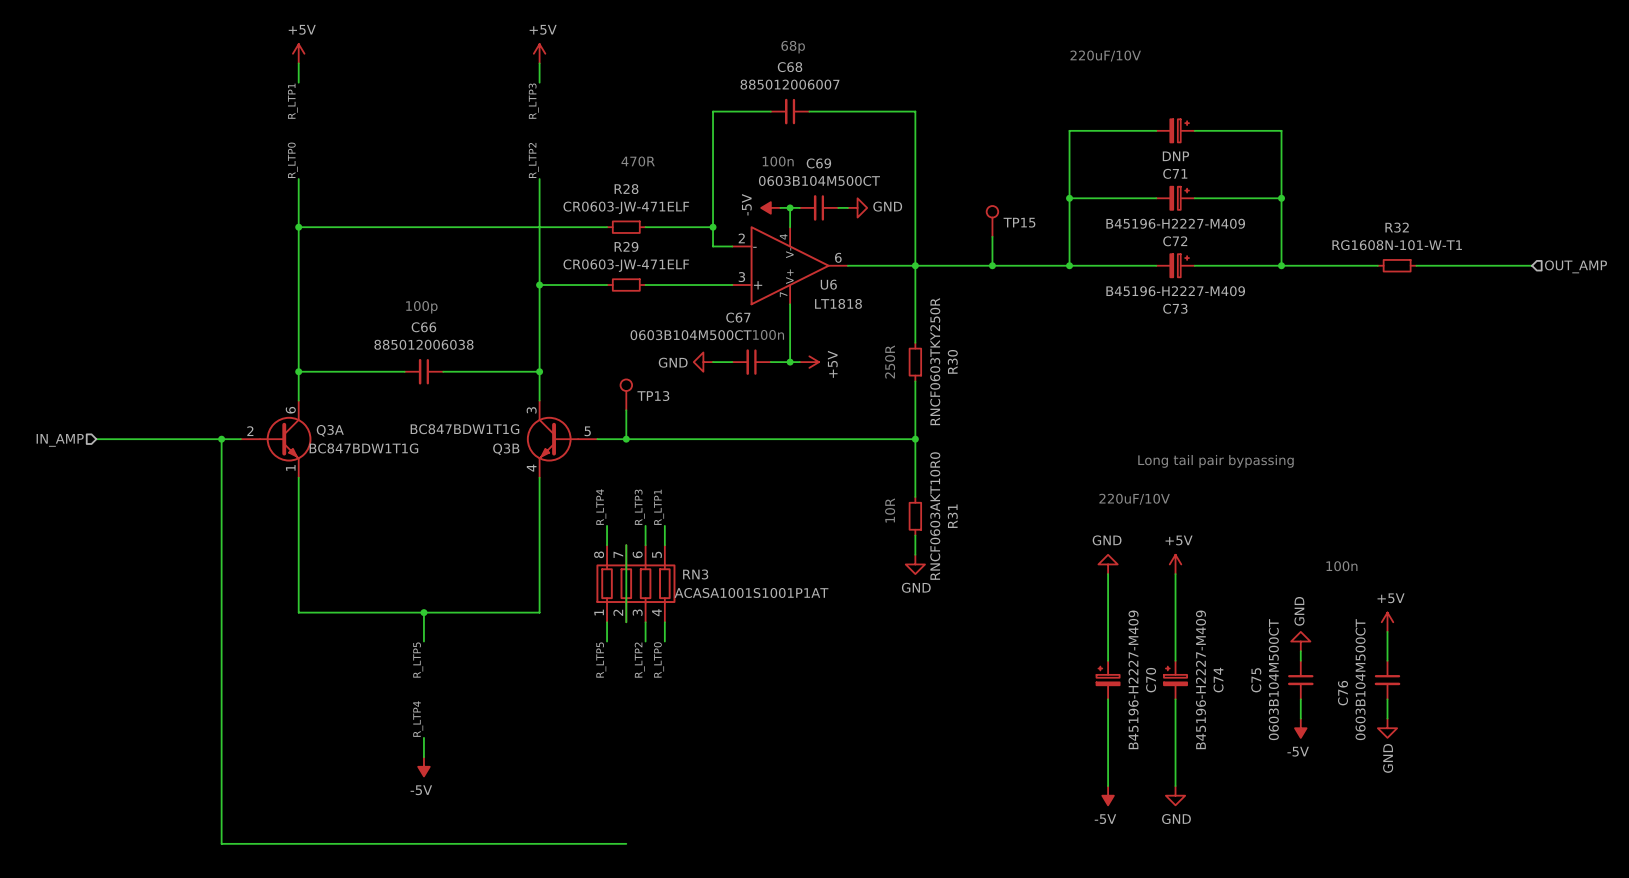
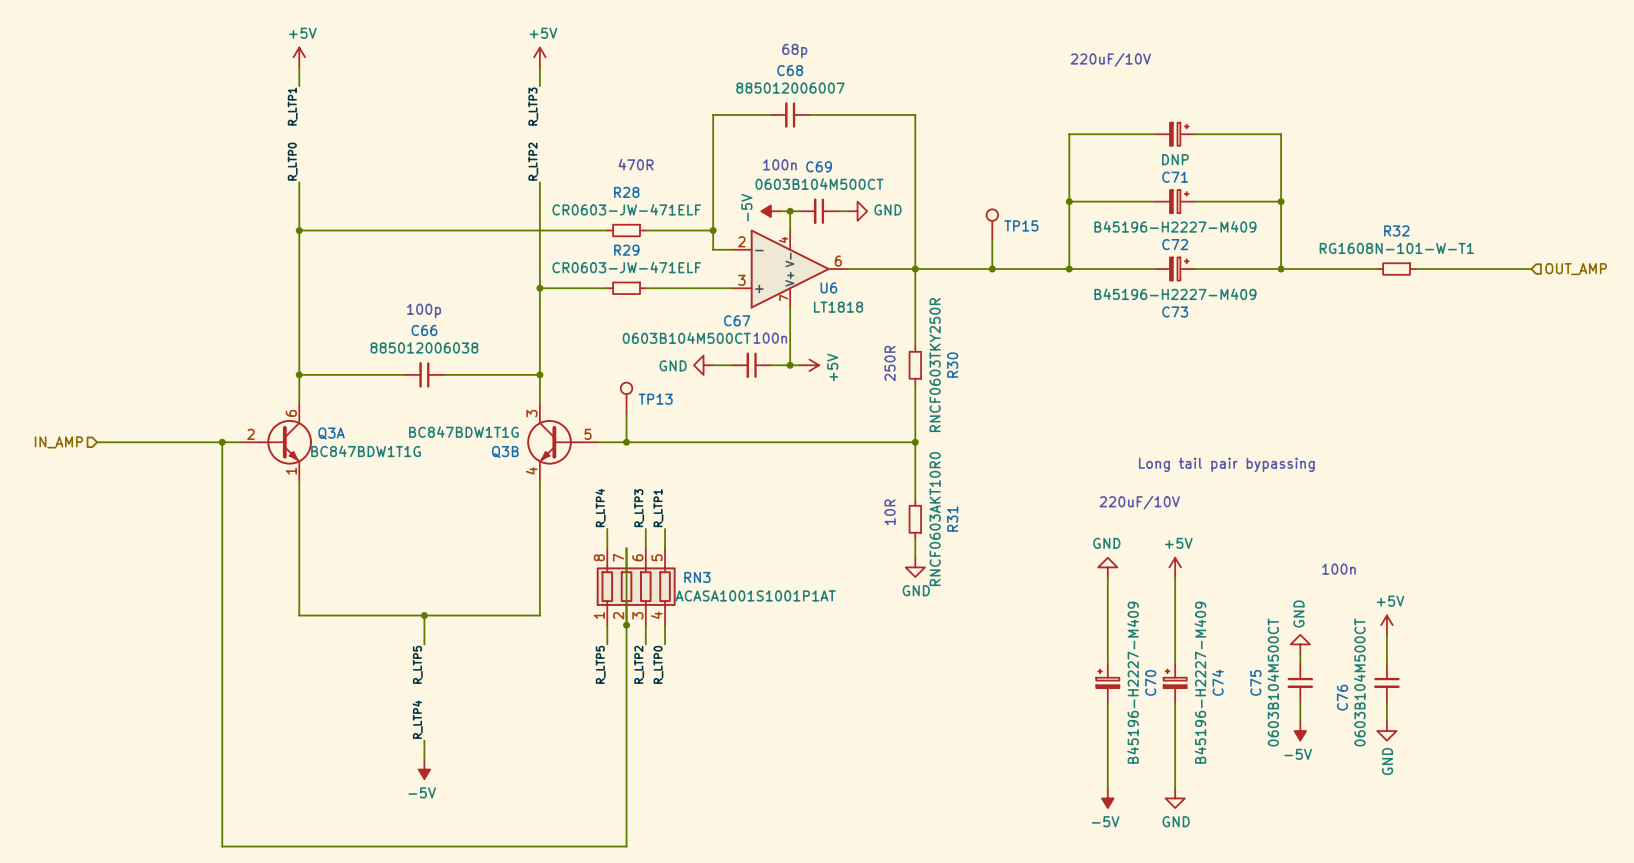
wire: none -> (626, 625) (626, 846)
junction: none -> (626, 625)

